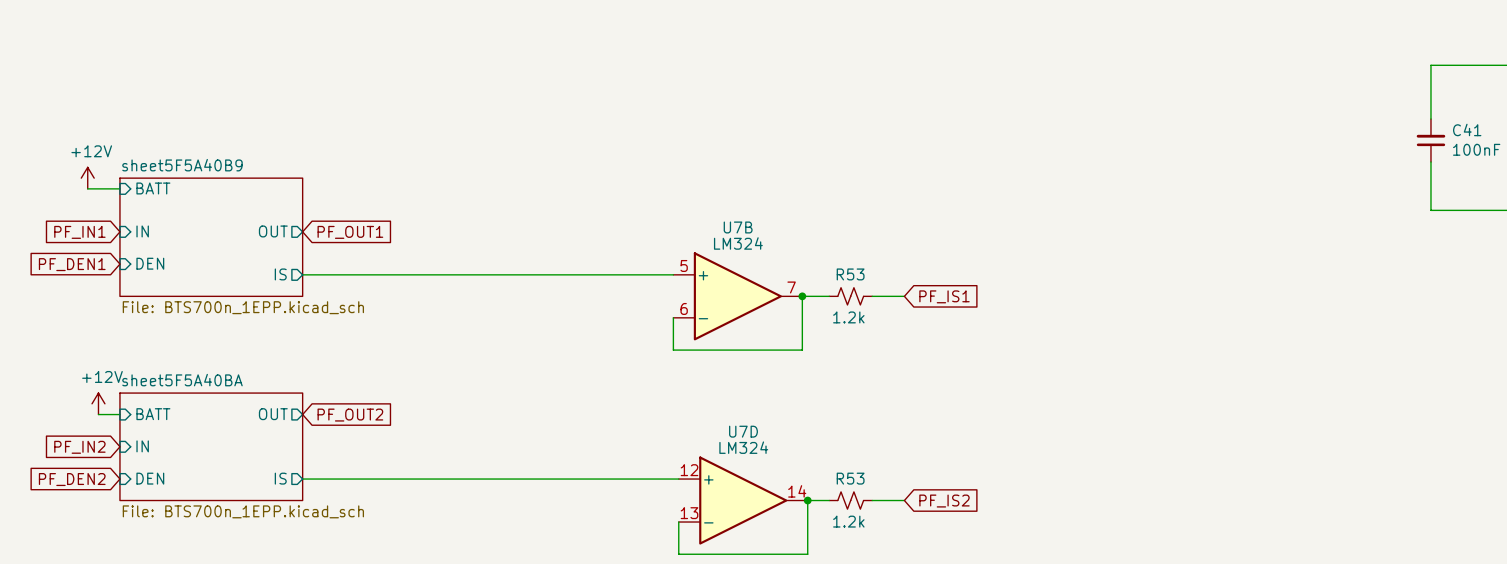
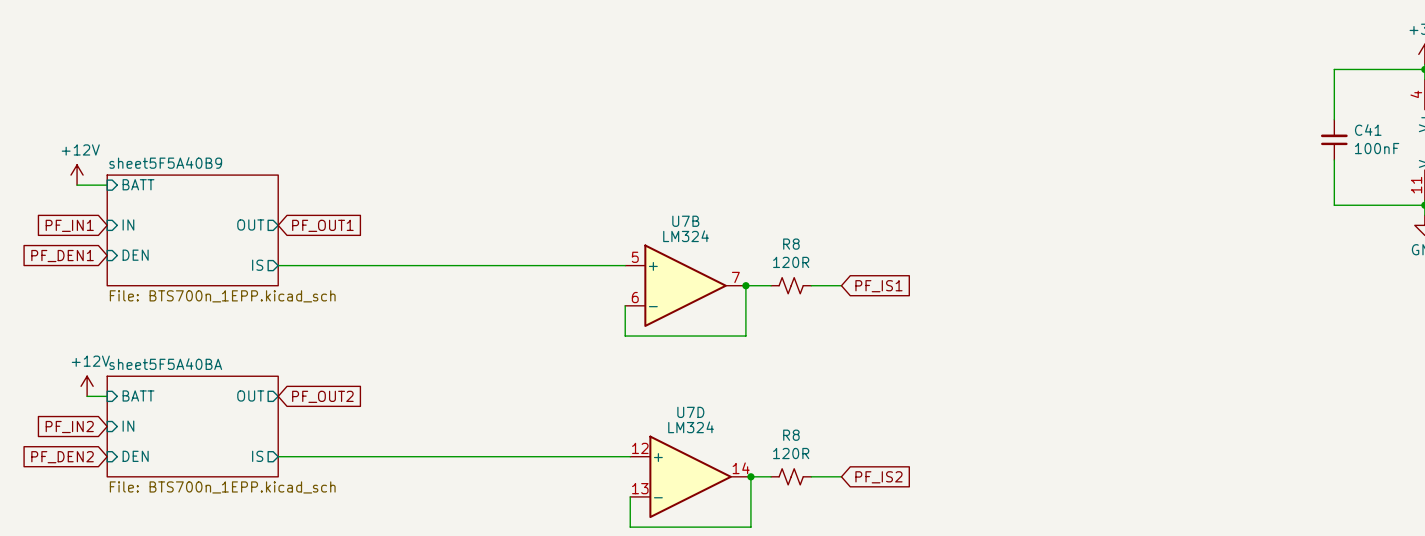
R53 name: R53 (850, 274) -> R8 (791, 244)
R53 value: 1.2k (848, 317) -> 120R (791, 262)
R53 name: R53 (850, 478) -> R8 (791, 435)
R53 value: 1.2k (848, 521) -> 120R (791, 453)

